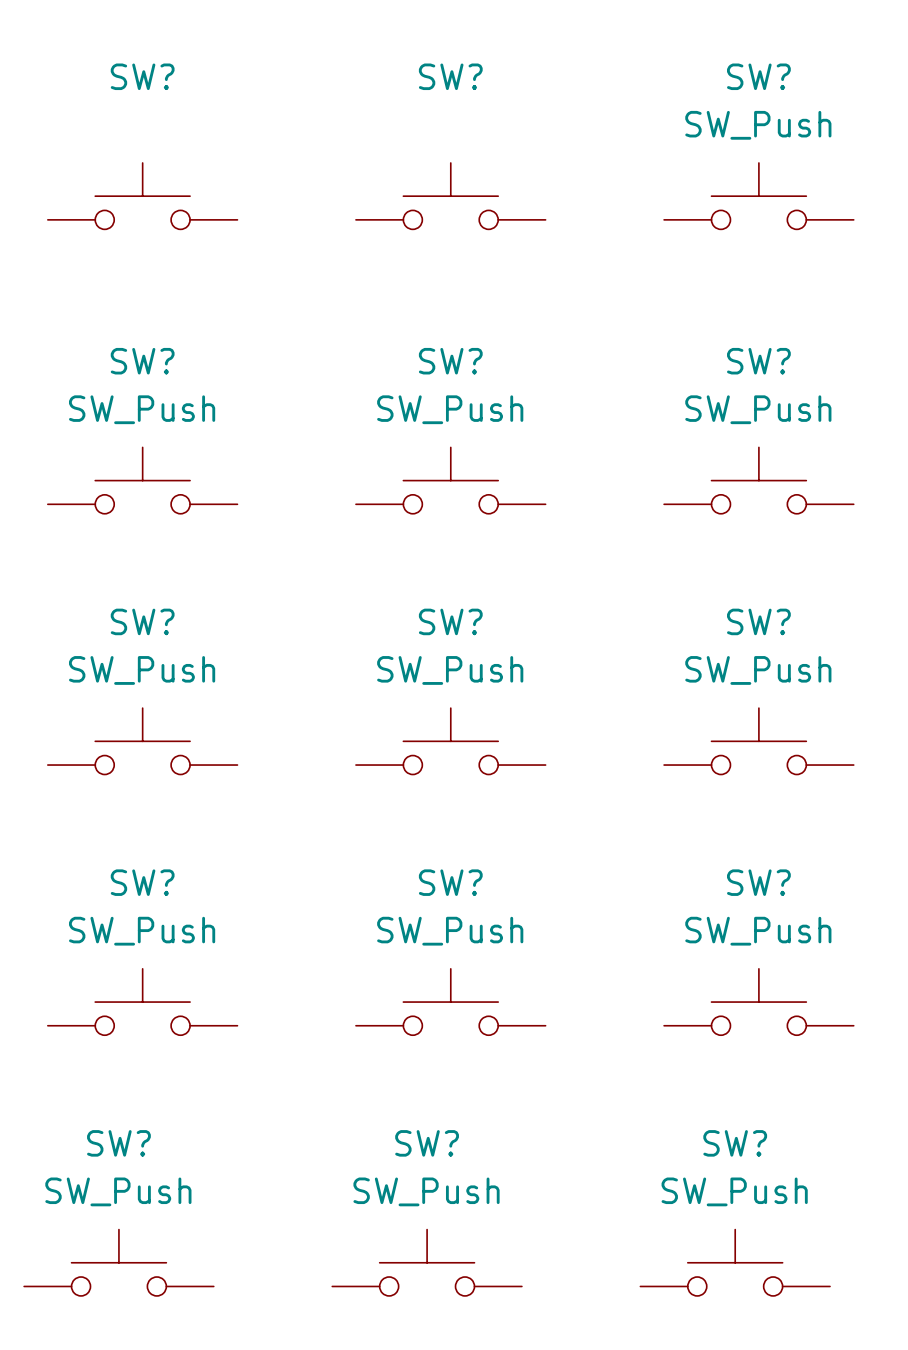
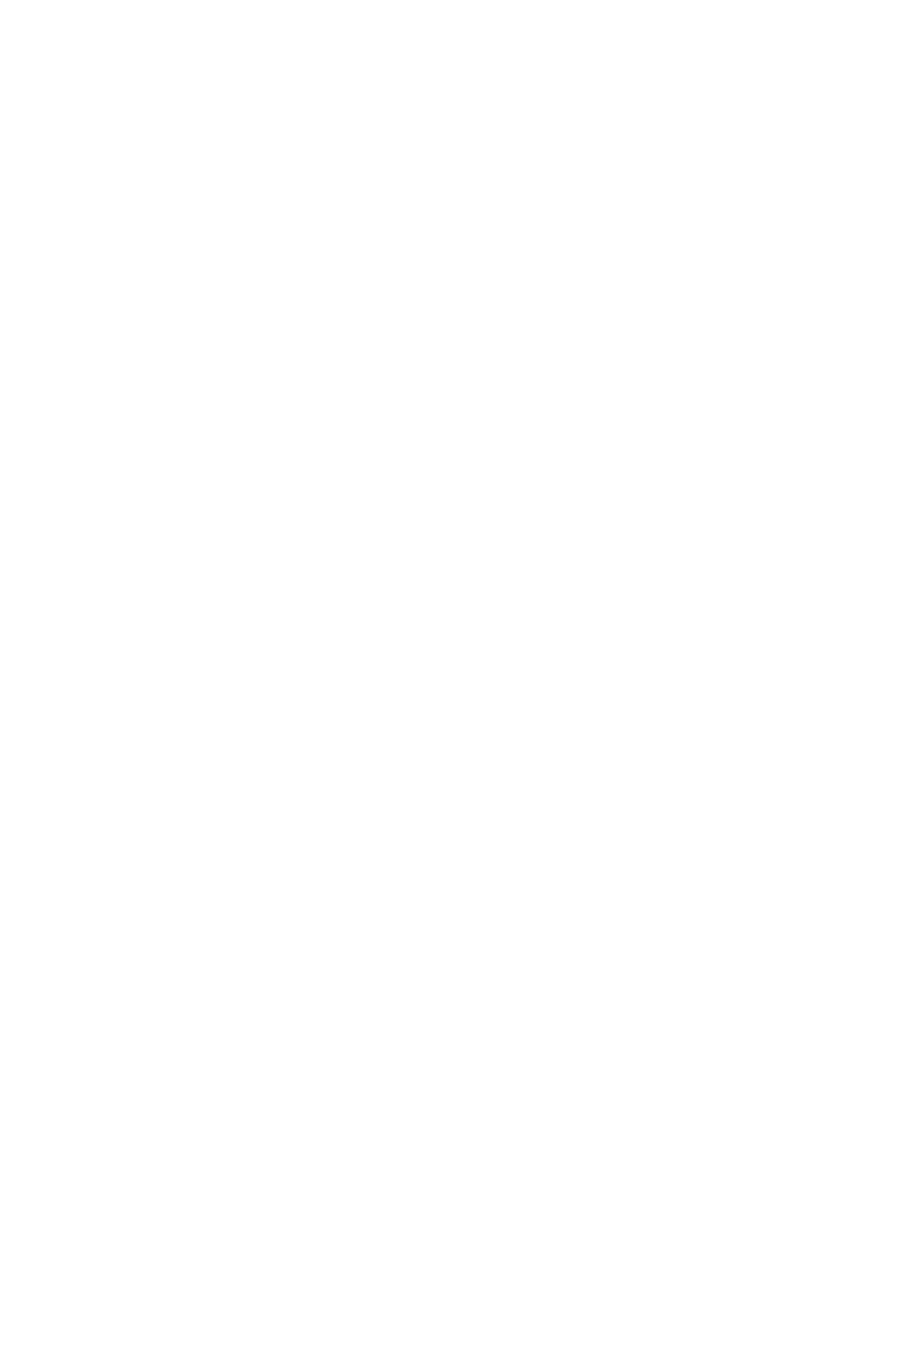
SW?: (142, 196) -> none
SW?: (450, 196) -> none
SW?: SW_Push (758, 196) -> none
SW?: SW_Push (142, 480) -> none
SW?: SW_Push (450, 480) -> none
SW?: SW_Push (758, 480) -> none
SW?: SW_Push (142, 741) -> none
SW?: SW_Push (450, 741) -> none
SW?: SW_Push (758, 741) -> none
SW?: SW_Push (142, 1002) -> none
SW?: SW_Push (450, 1002) -> none
SW?: SW_Push (758, 1002) -> none
SW?: SW_Push (118, 1262) -> none
SW?: SW_Push (427, 1262) -> none
SW?: SW_Push (735, 1262) -> none

